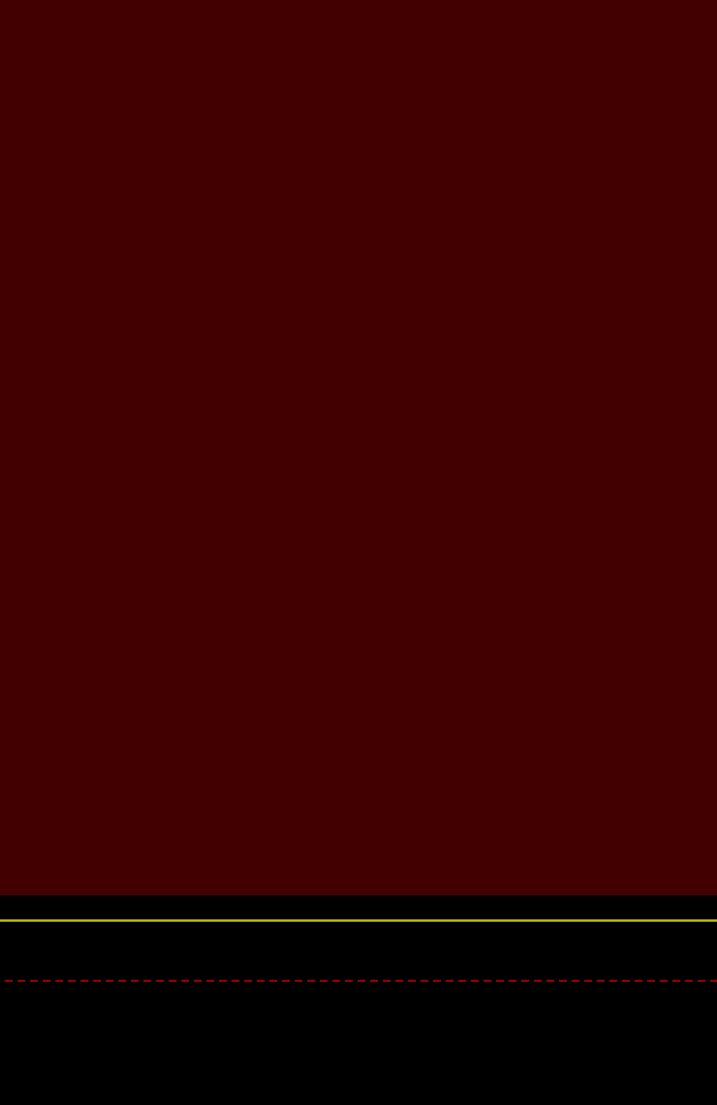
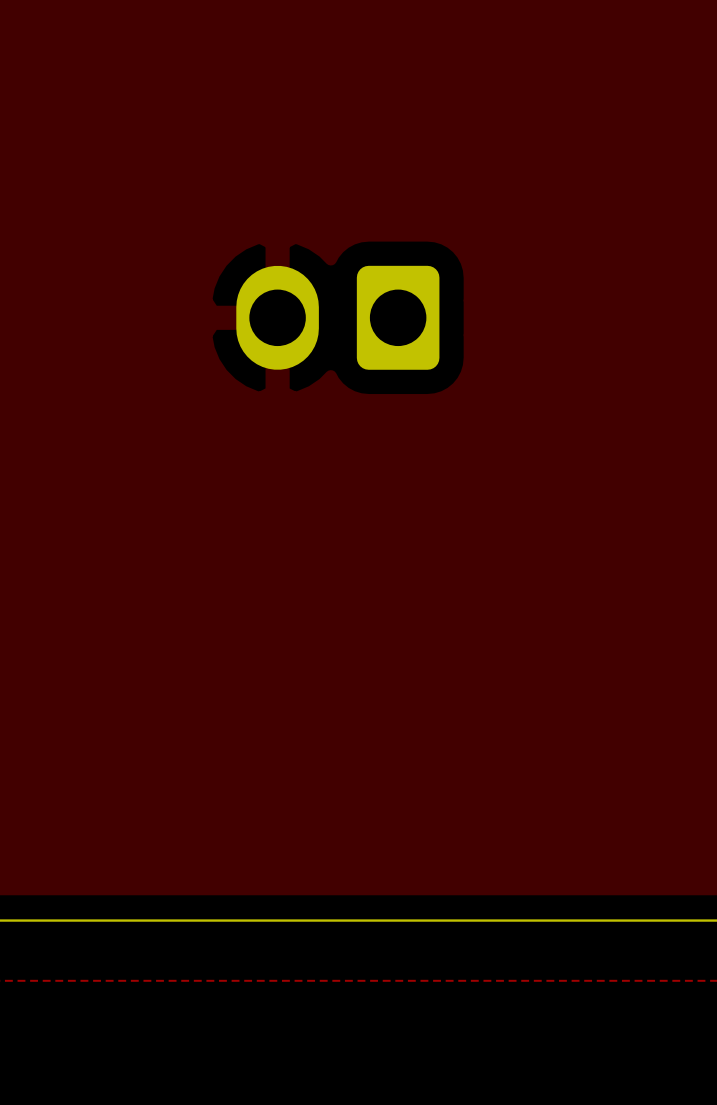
part: none -> (337, 317)

